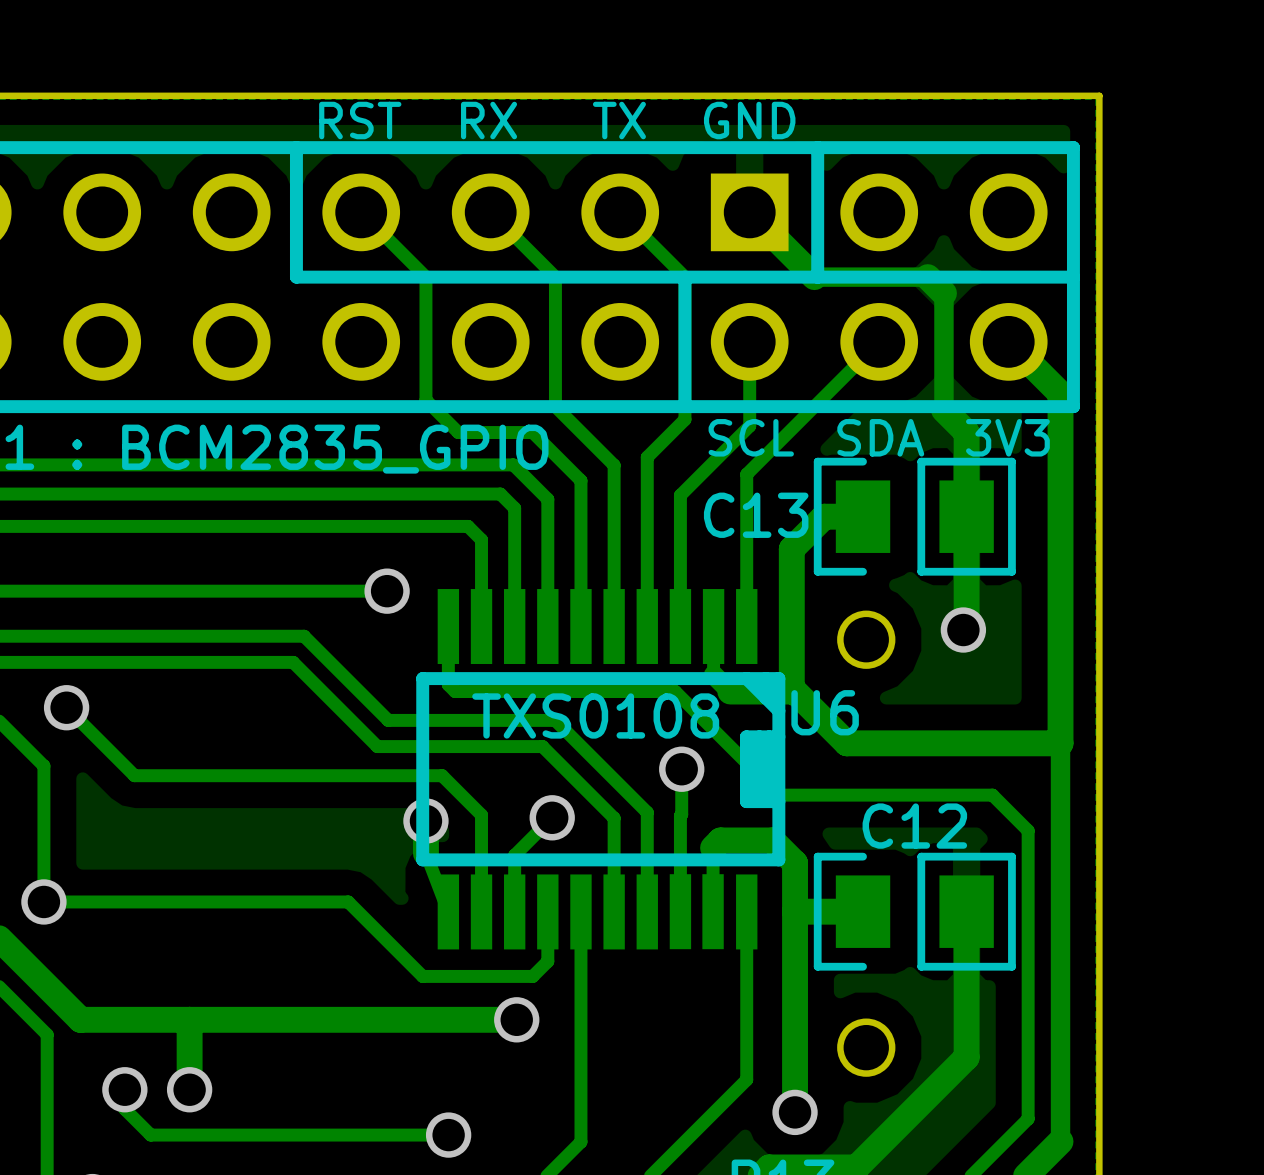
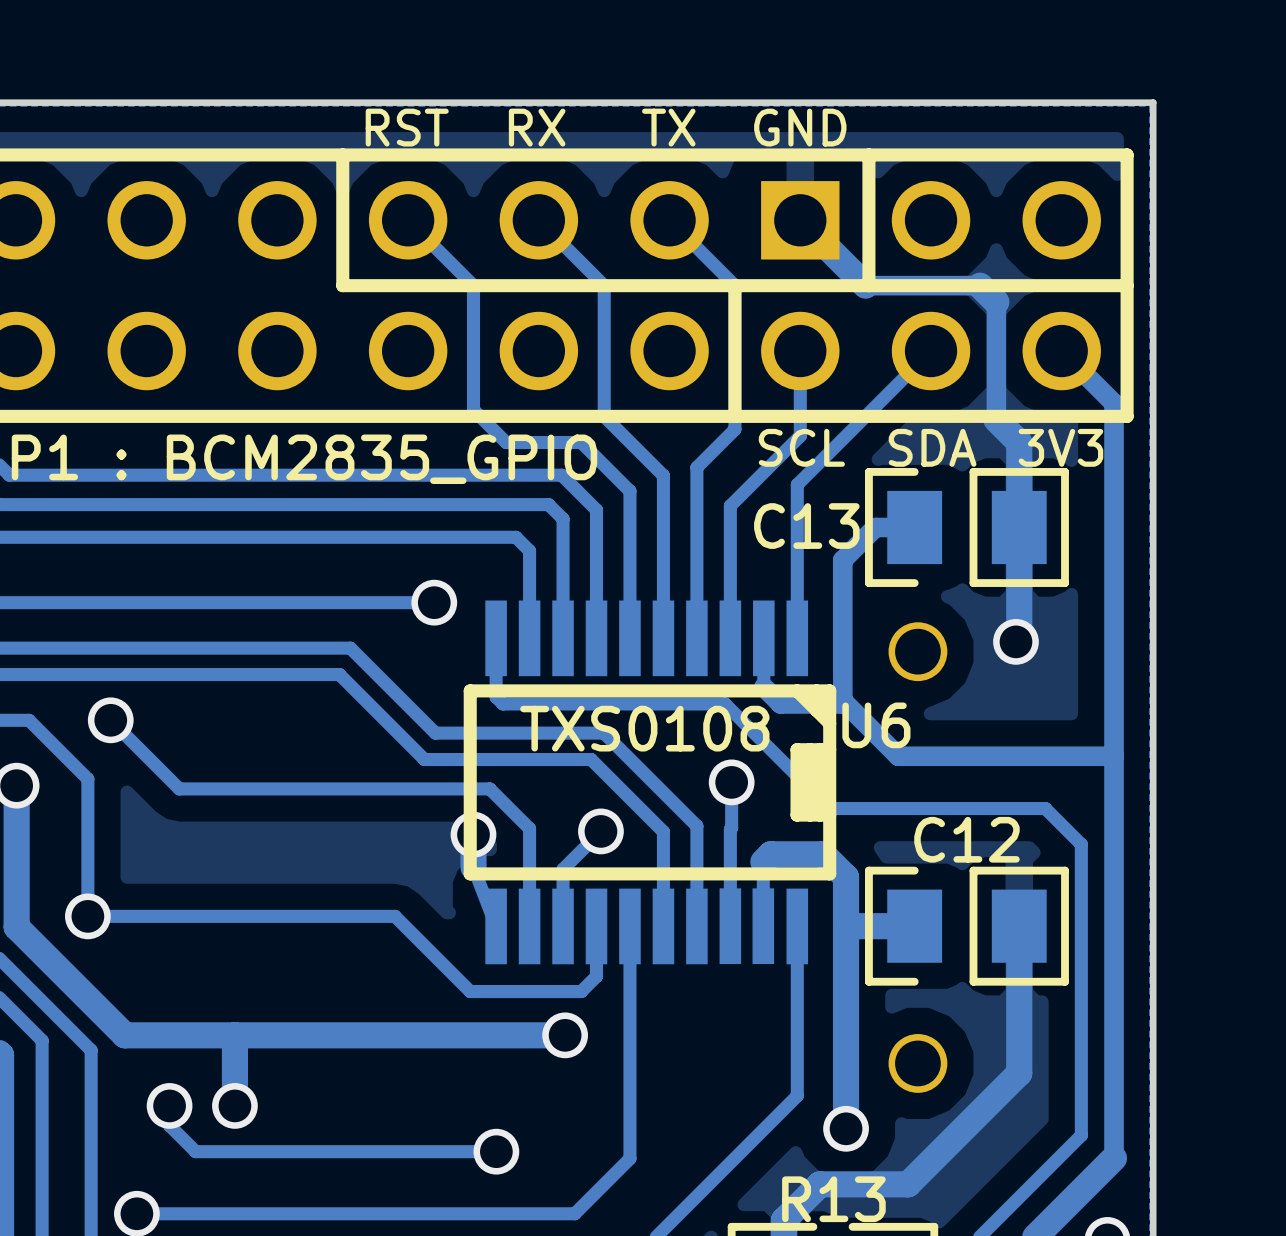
track width: thick (1008, 341) (1060, 393) (1060, 743) (846, 743) (791, 688) -> thin (1061, 351) (1114, 403) (1114, 756) (898, 756) (842, 700)
track width: thick (863, 516) (824, 516) (791, 549) (791, 691) (730, 691) -> thin (914, 527) (875, 527) (842, 560) (842, 703) (780, 703)

